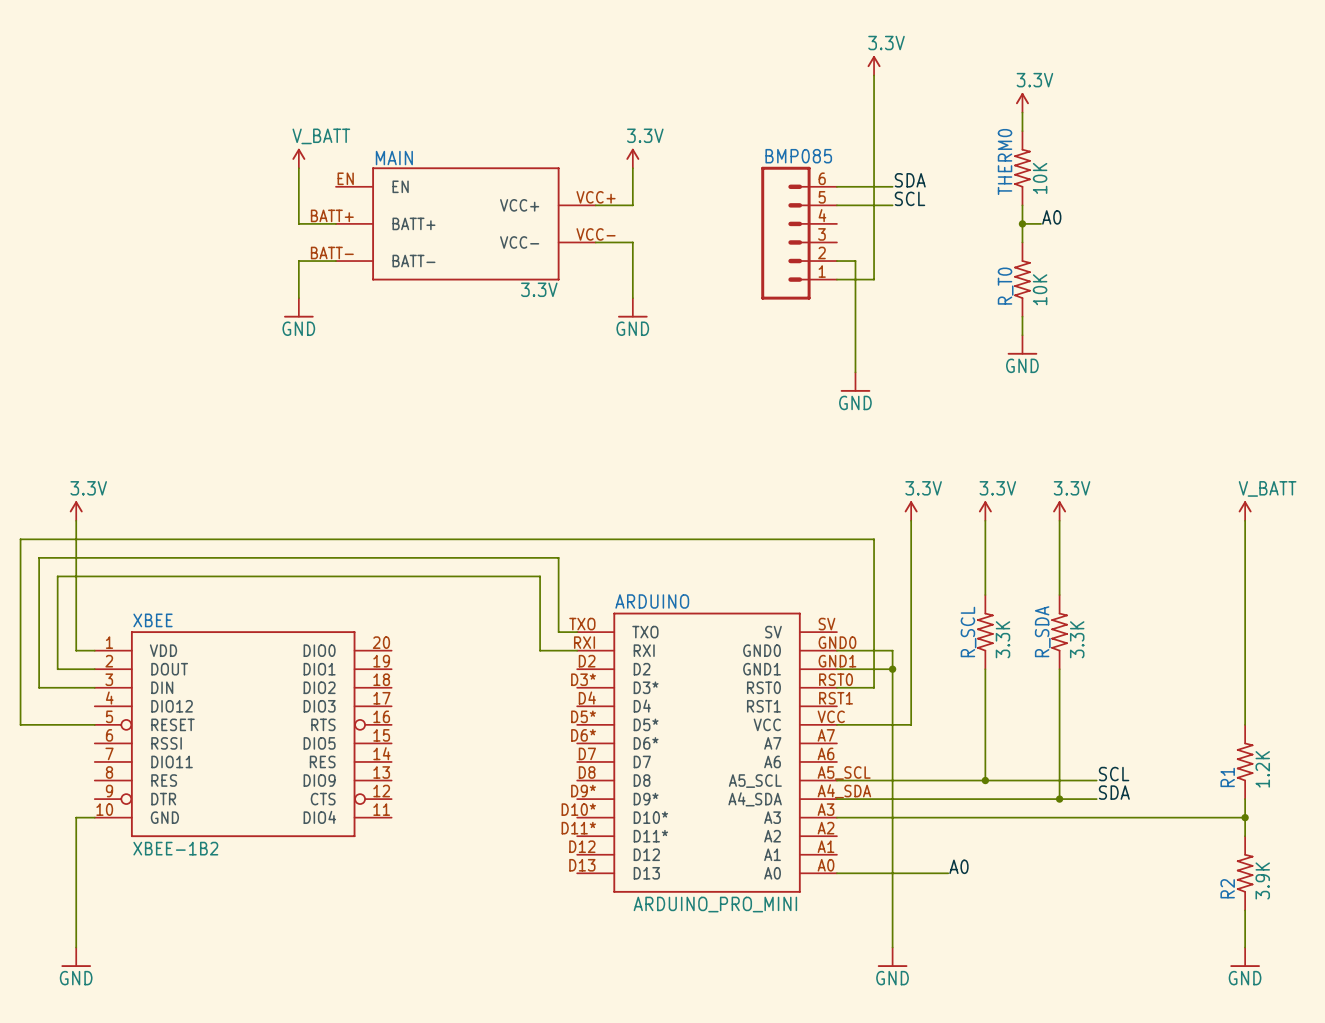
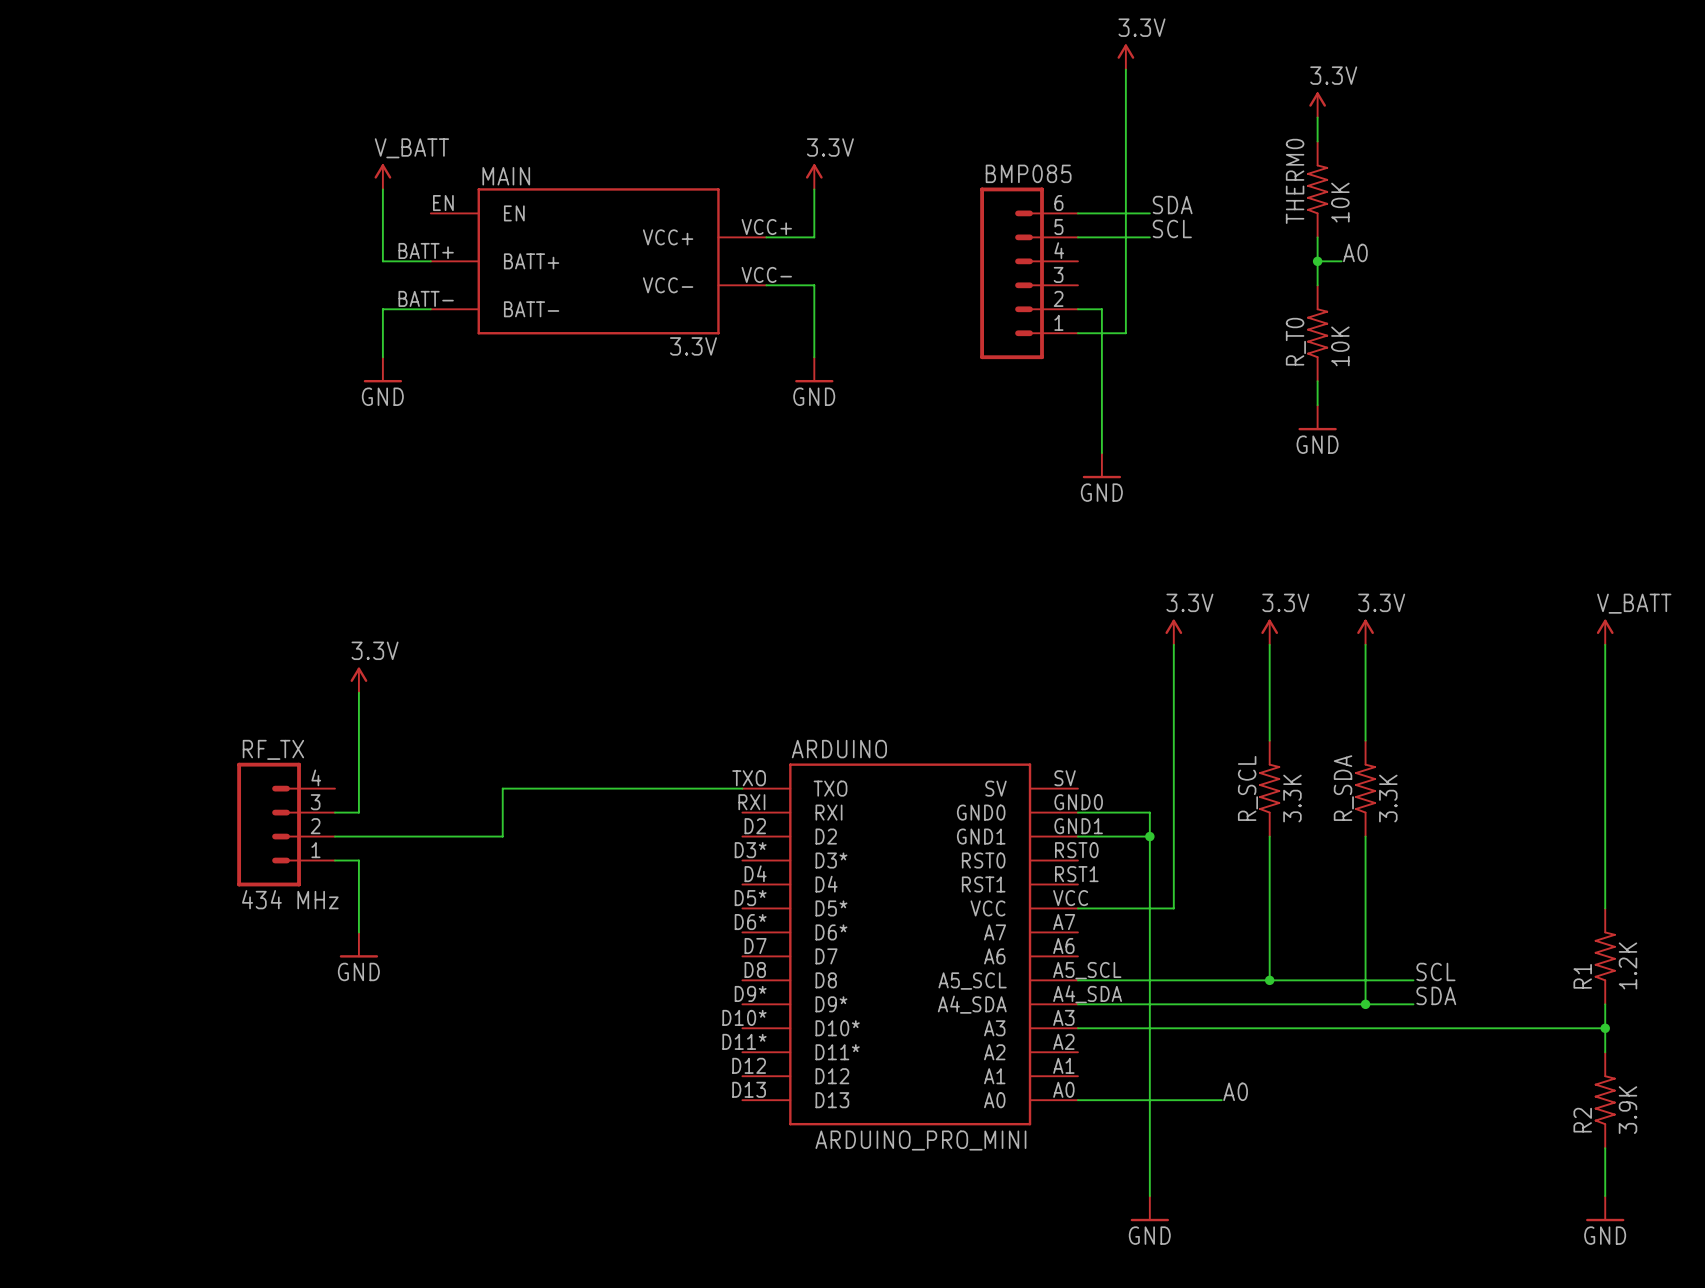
power symbol: 3.3V (76, 511) -> none
wire: (76, 520) (76, 650) (94, 650) -> none
power symbol: none -> 3.3V (358, 680)
wire: none -> (358, 692) (358, 812) (334, 812)
wire: (558, 632) (558, 557) (39, 557) (39, 687) (94, 687) -> (718, 788) (502, 788) (502, 836) (334, 836)
wire: (577, 650) (540, 650) (540, 576) (57, 576) (57, 669) (94, 669) -> none
RF_TX: none -> 434 MHz (286, 824)
wire: none -> (334, 860) (358, 860) (358, 932)
wire: (836, 687) (874, 687) (874, 539) (20, 539) (20, 724) (94, 724) -> none
XBEE: XBEE-1B2 (243, 734) -> none
power symbol: none -> GND (358, 945)
wire: (94, 817) (76, 817) (76, 947) -> none
power symbol: GND (76, 957) -> none

